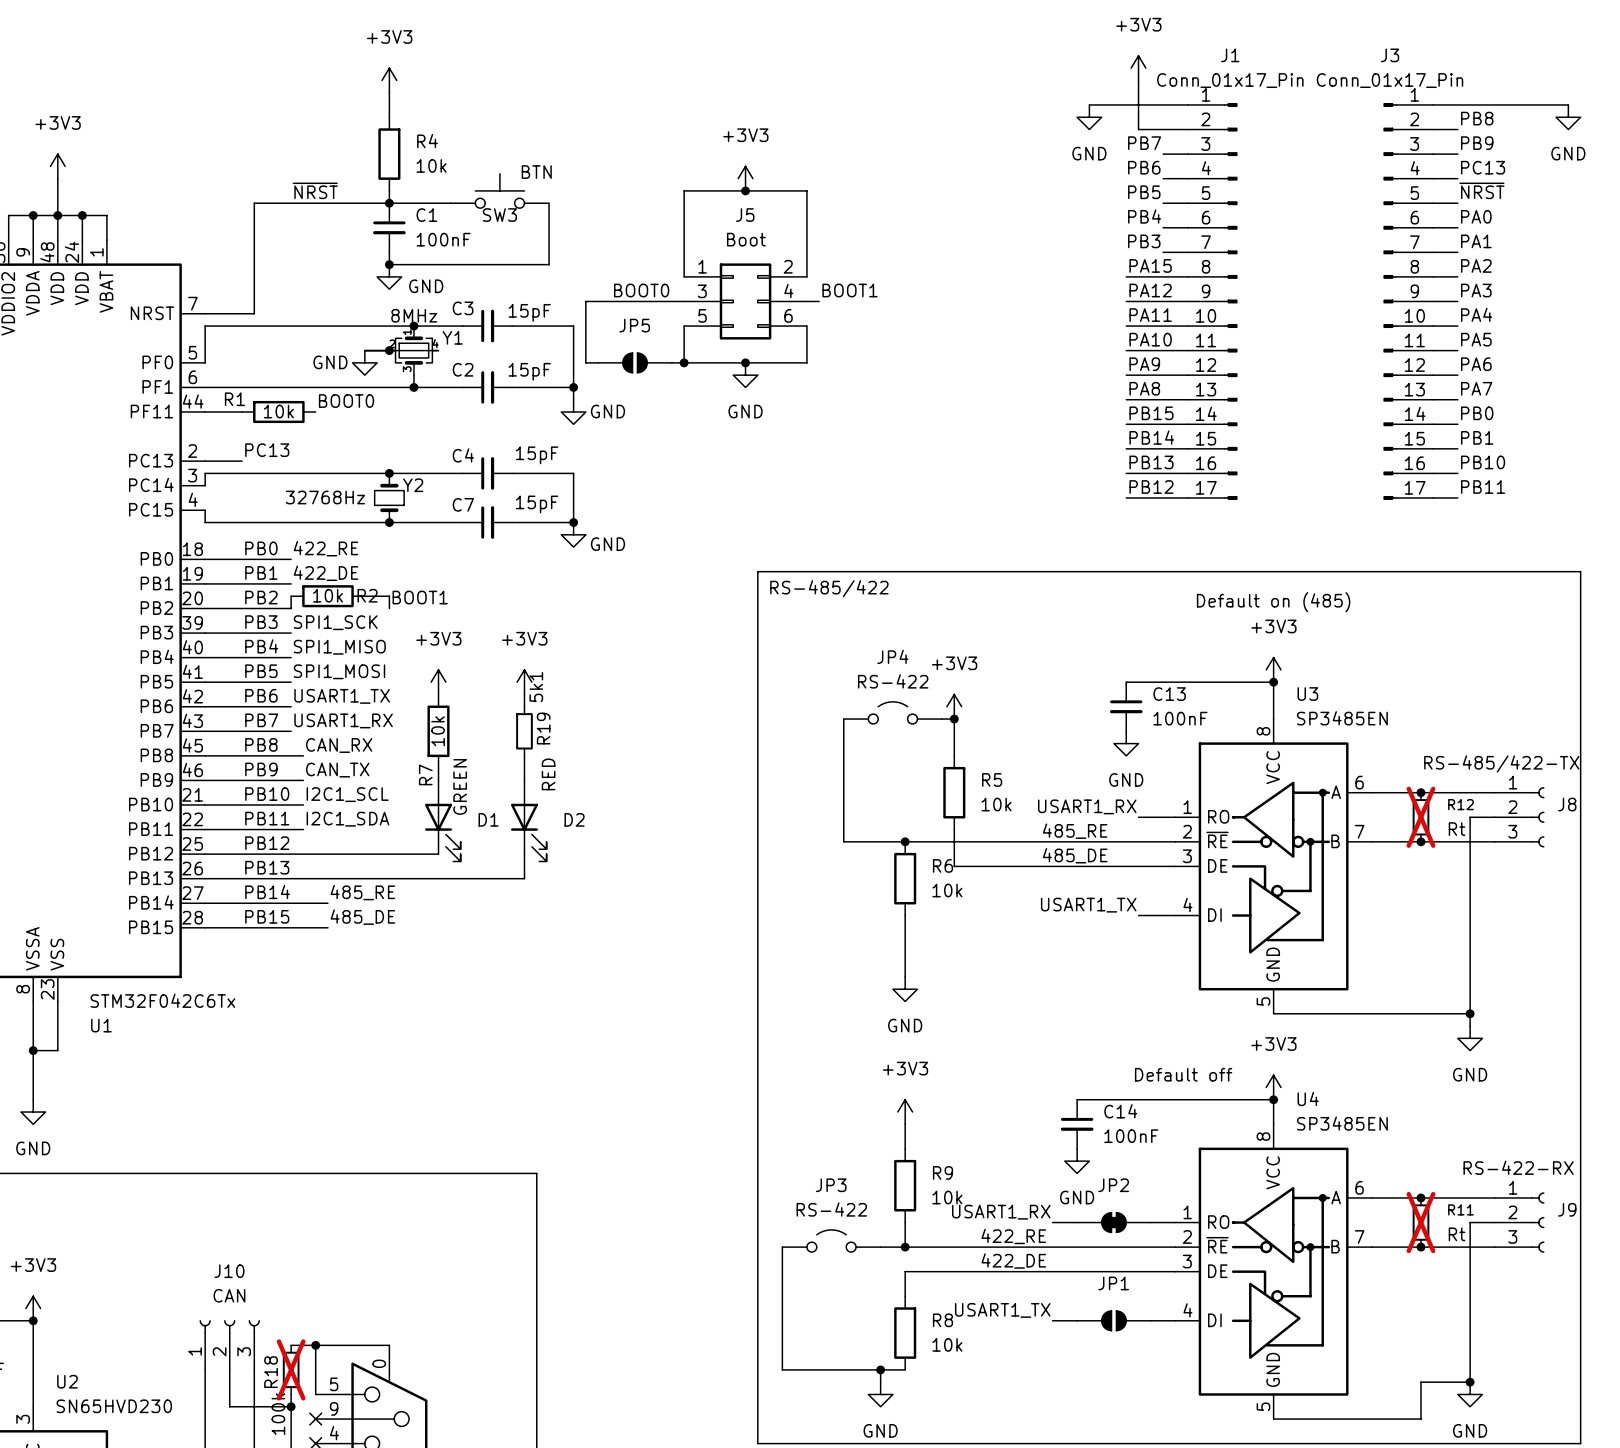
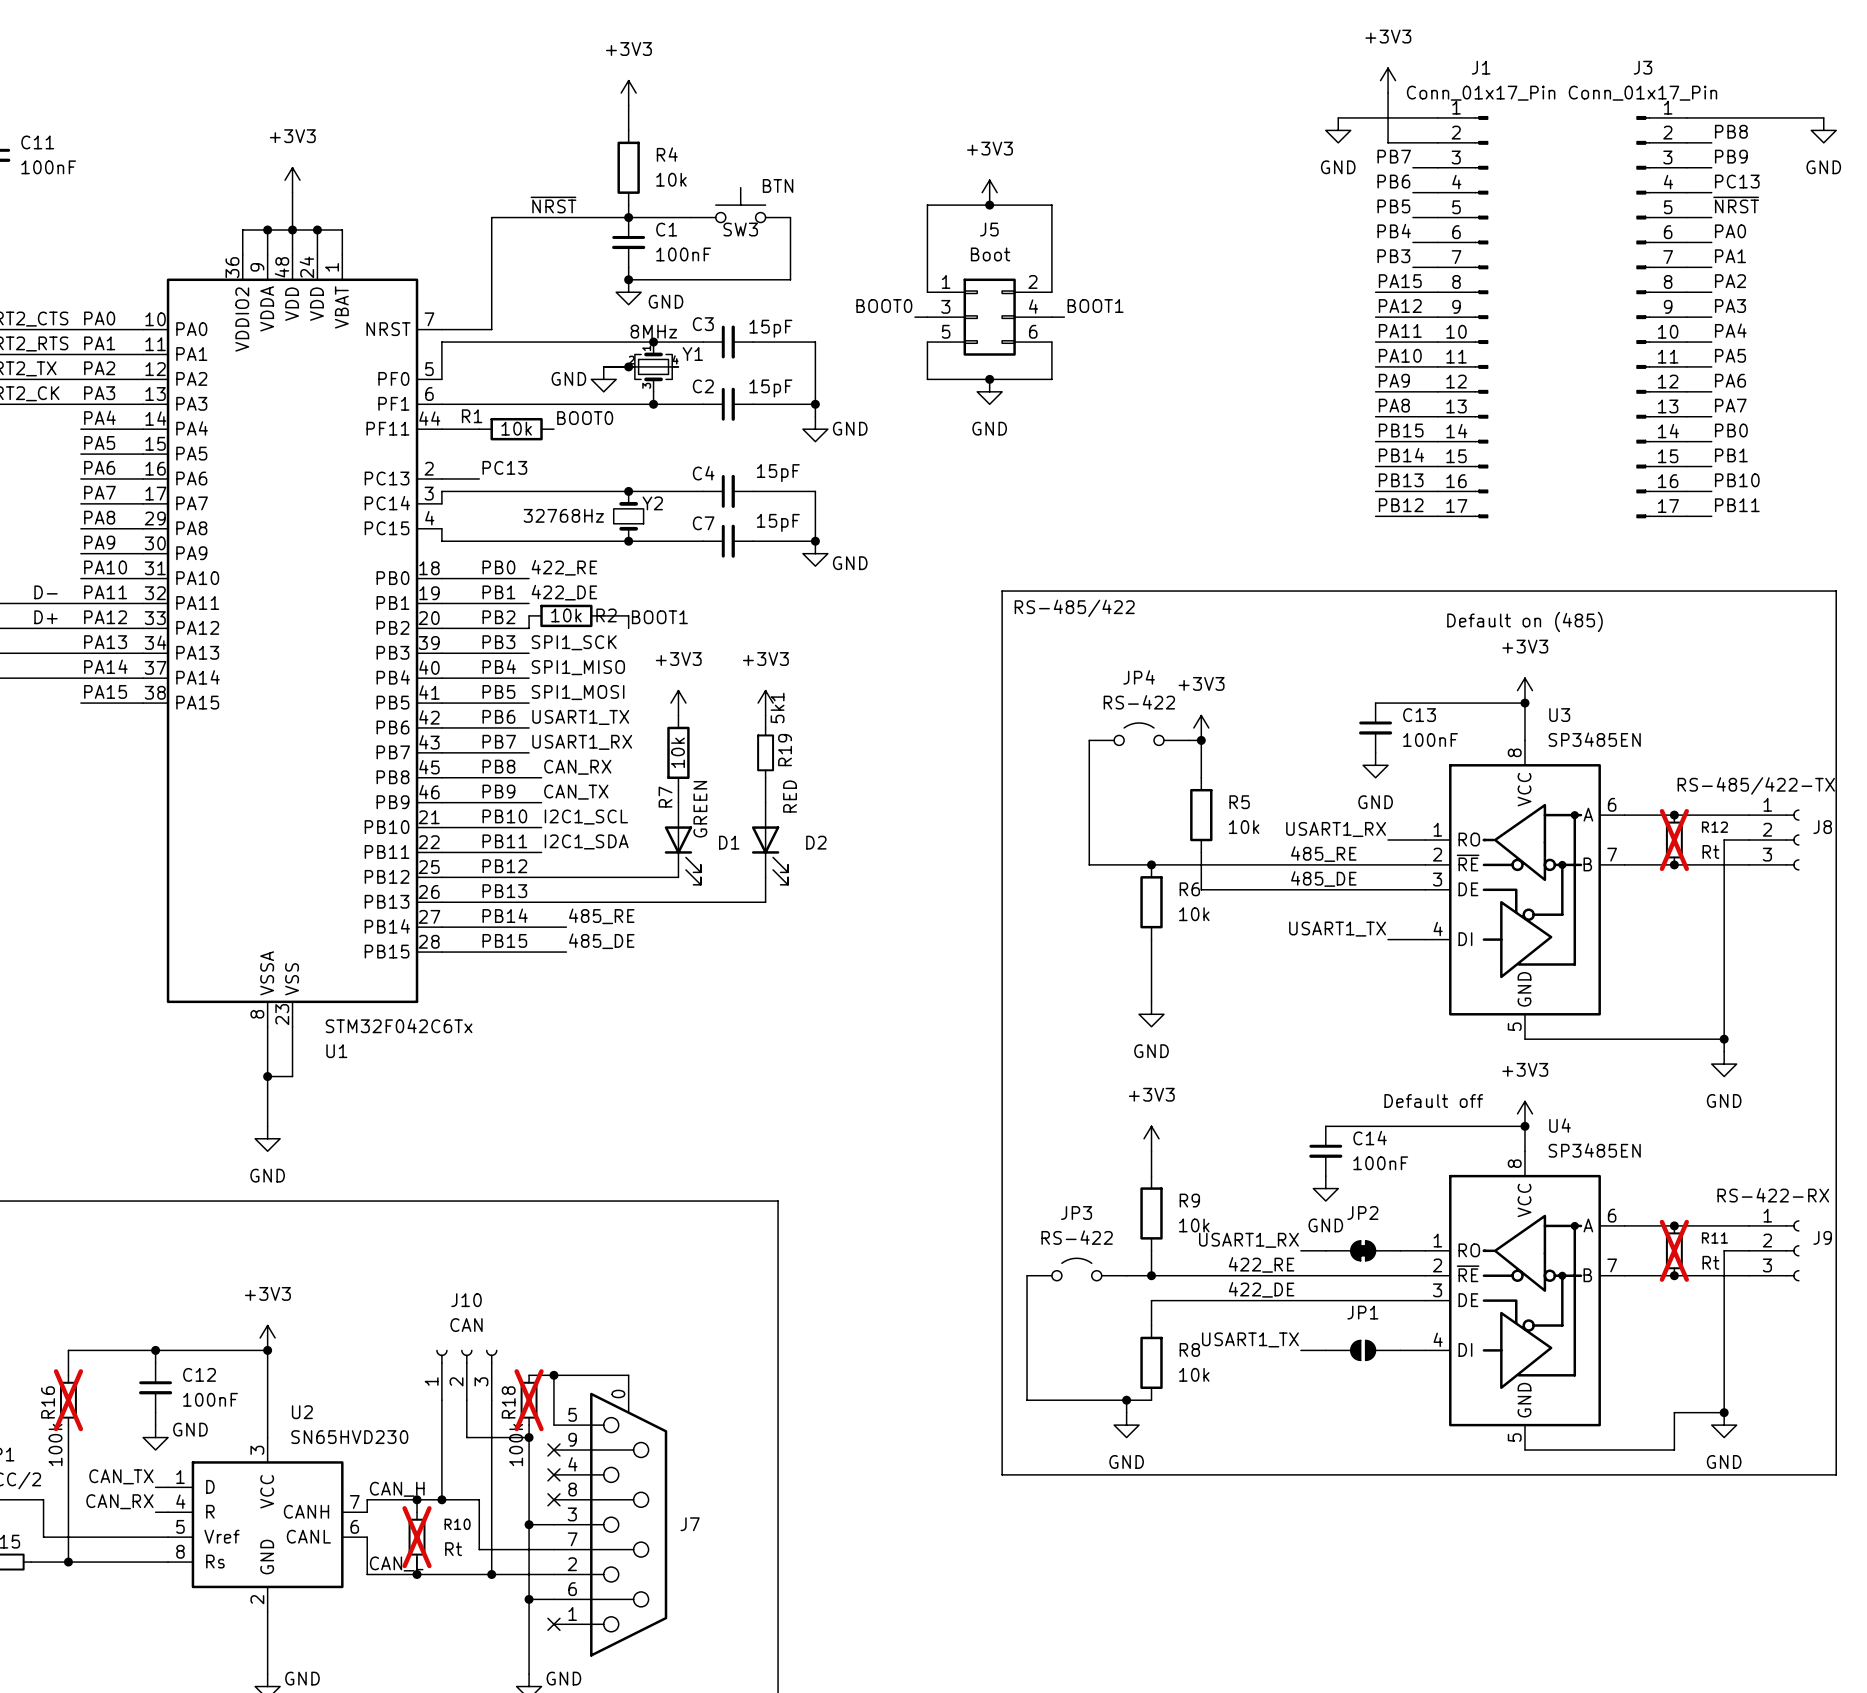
wire: (671, 301) (585, 301) (585, 362) (598, 362) -> none
JP5: (635, 362) -> none
wire: (671, 362) (684, 362) -> none
junction: (684, 362) -> none

